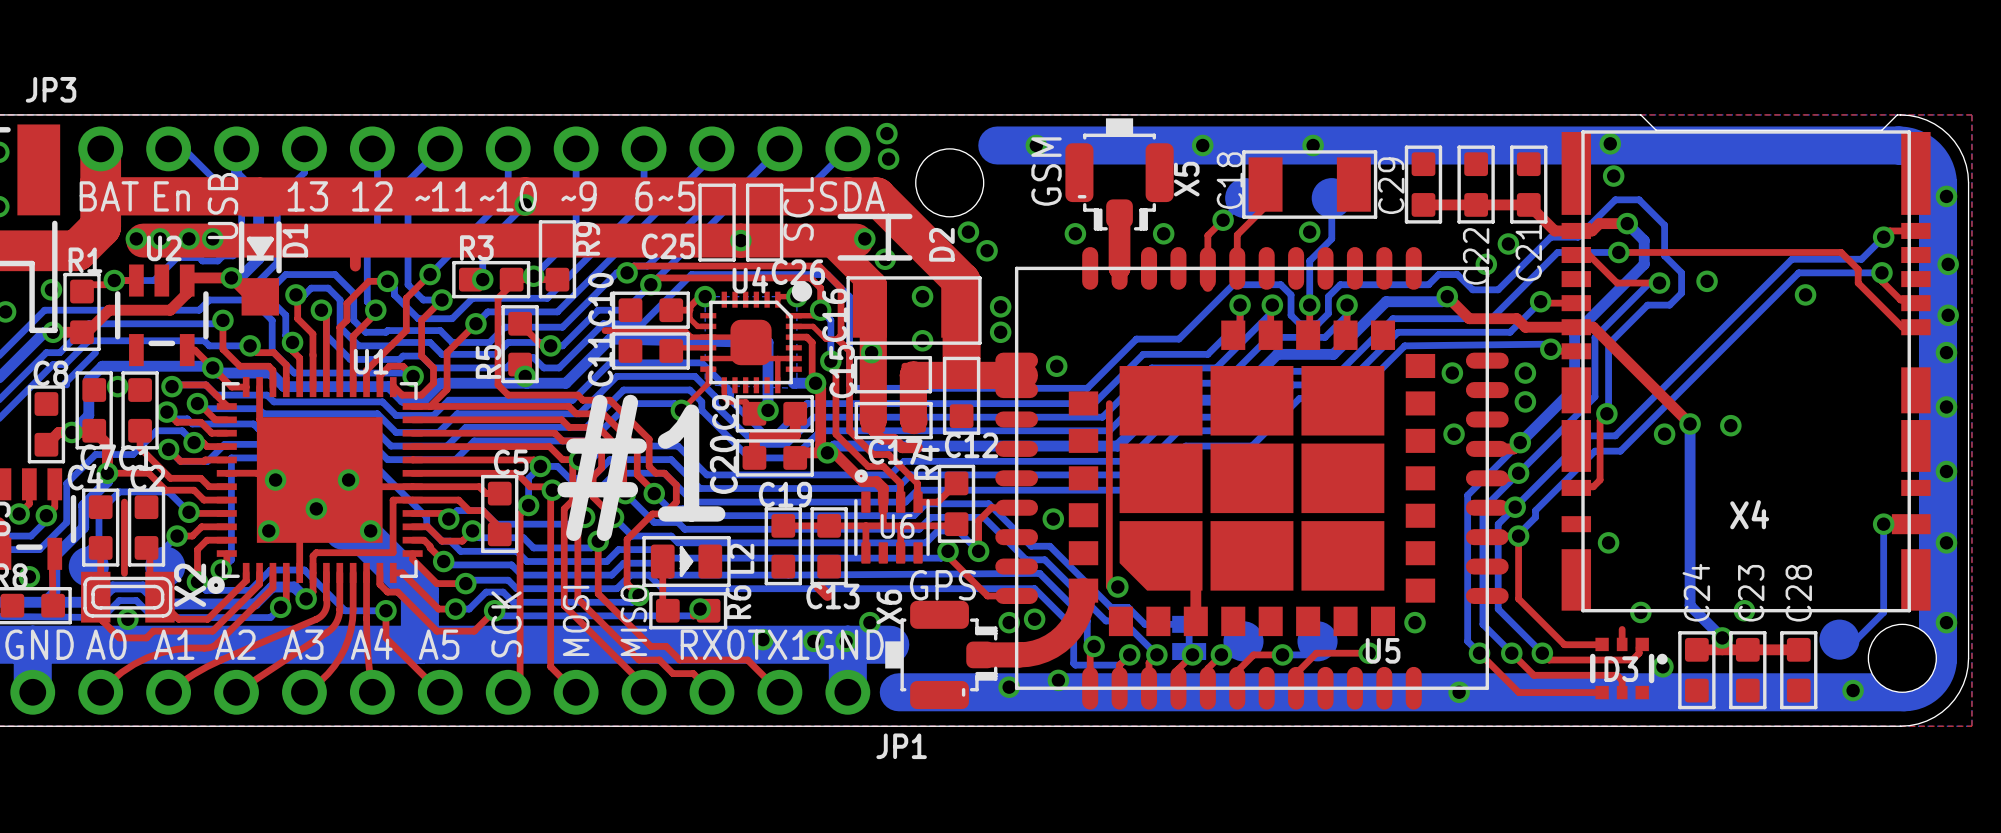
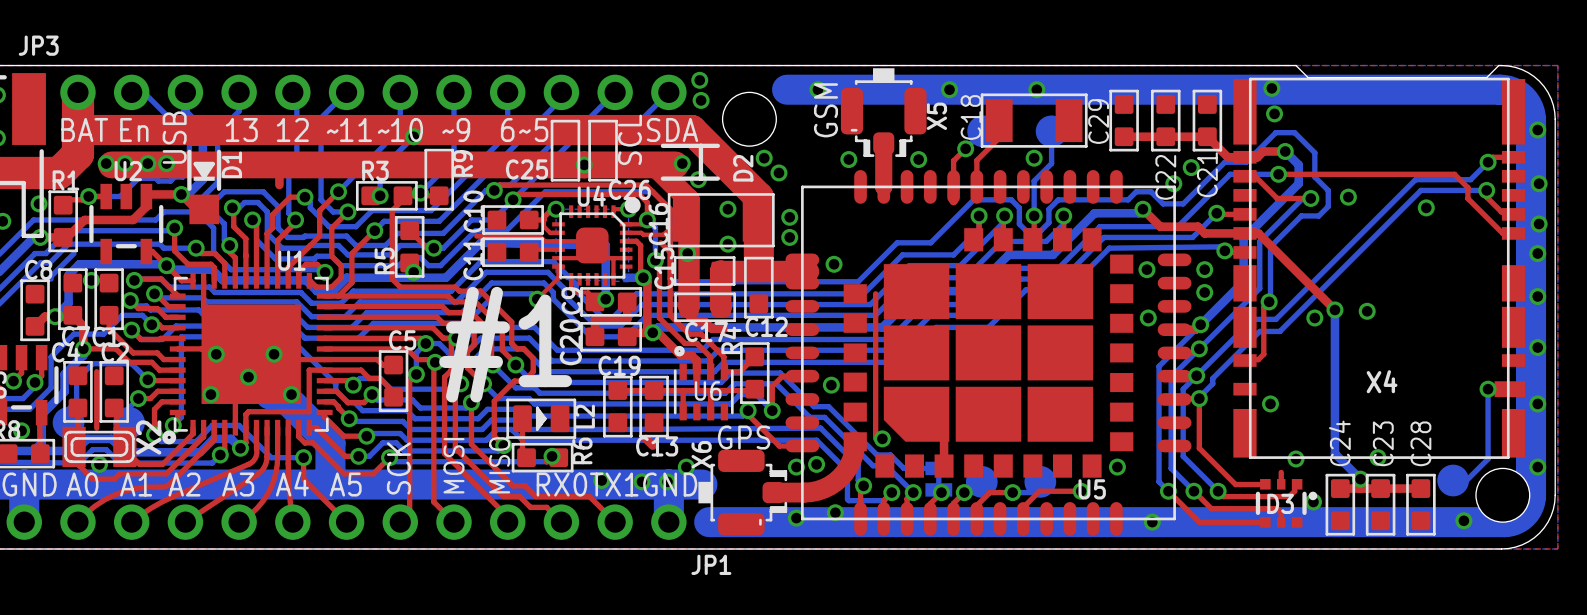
top track: (841, 288) (841, 335) (837, 339) (825, 339) (815, 328) -> (670, 228) (663, 234) (643, 234)
top track: none -> (663, 202) (670, 209) (670, 252)

